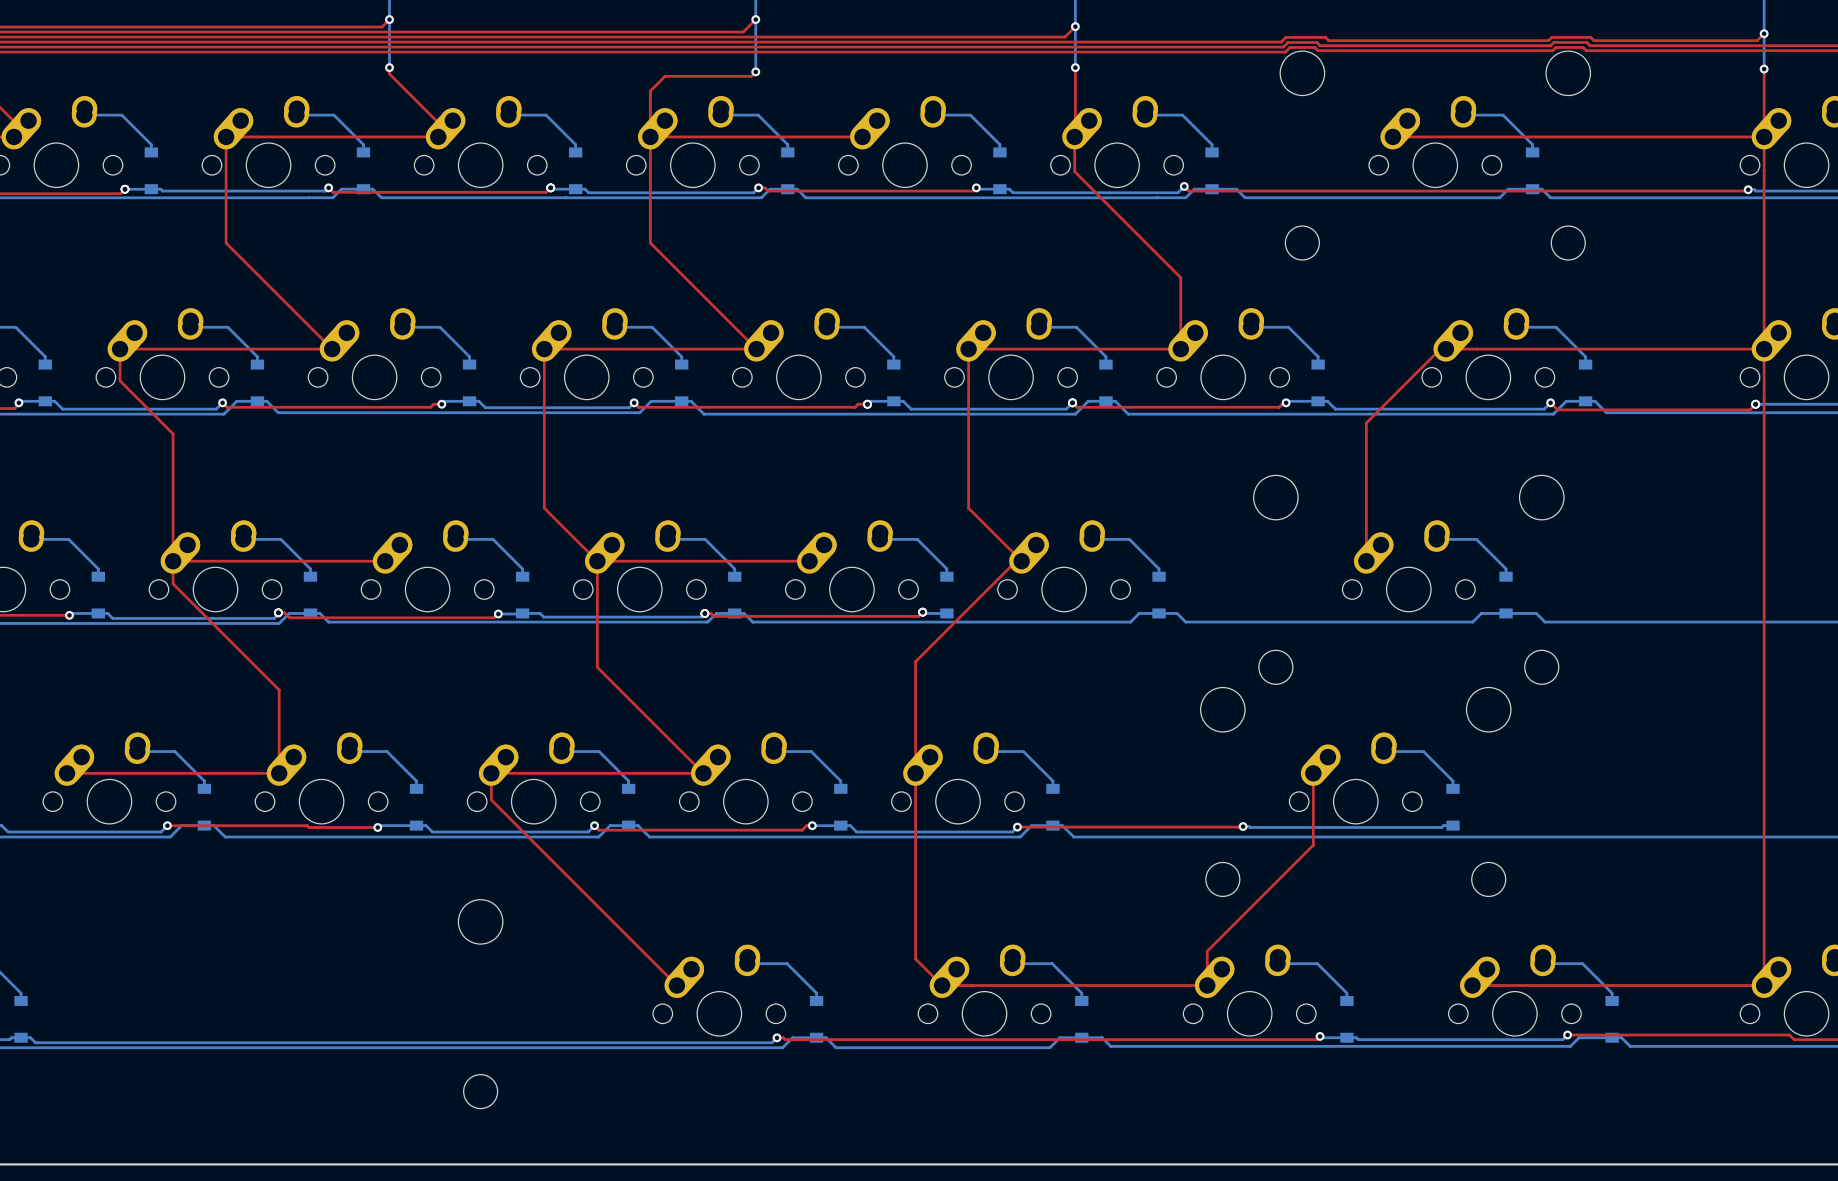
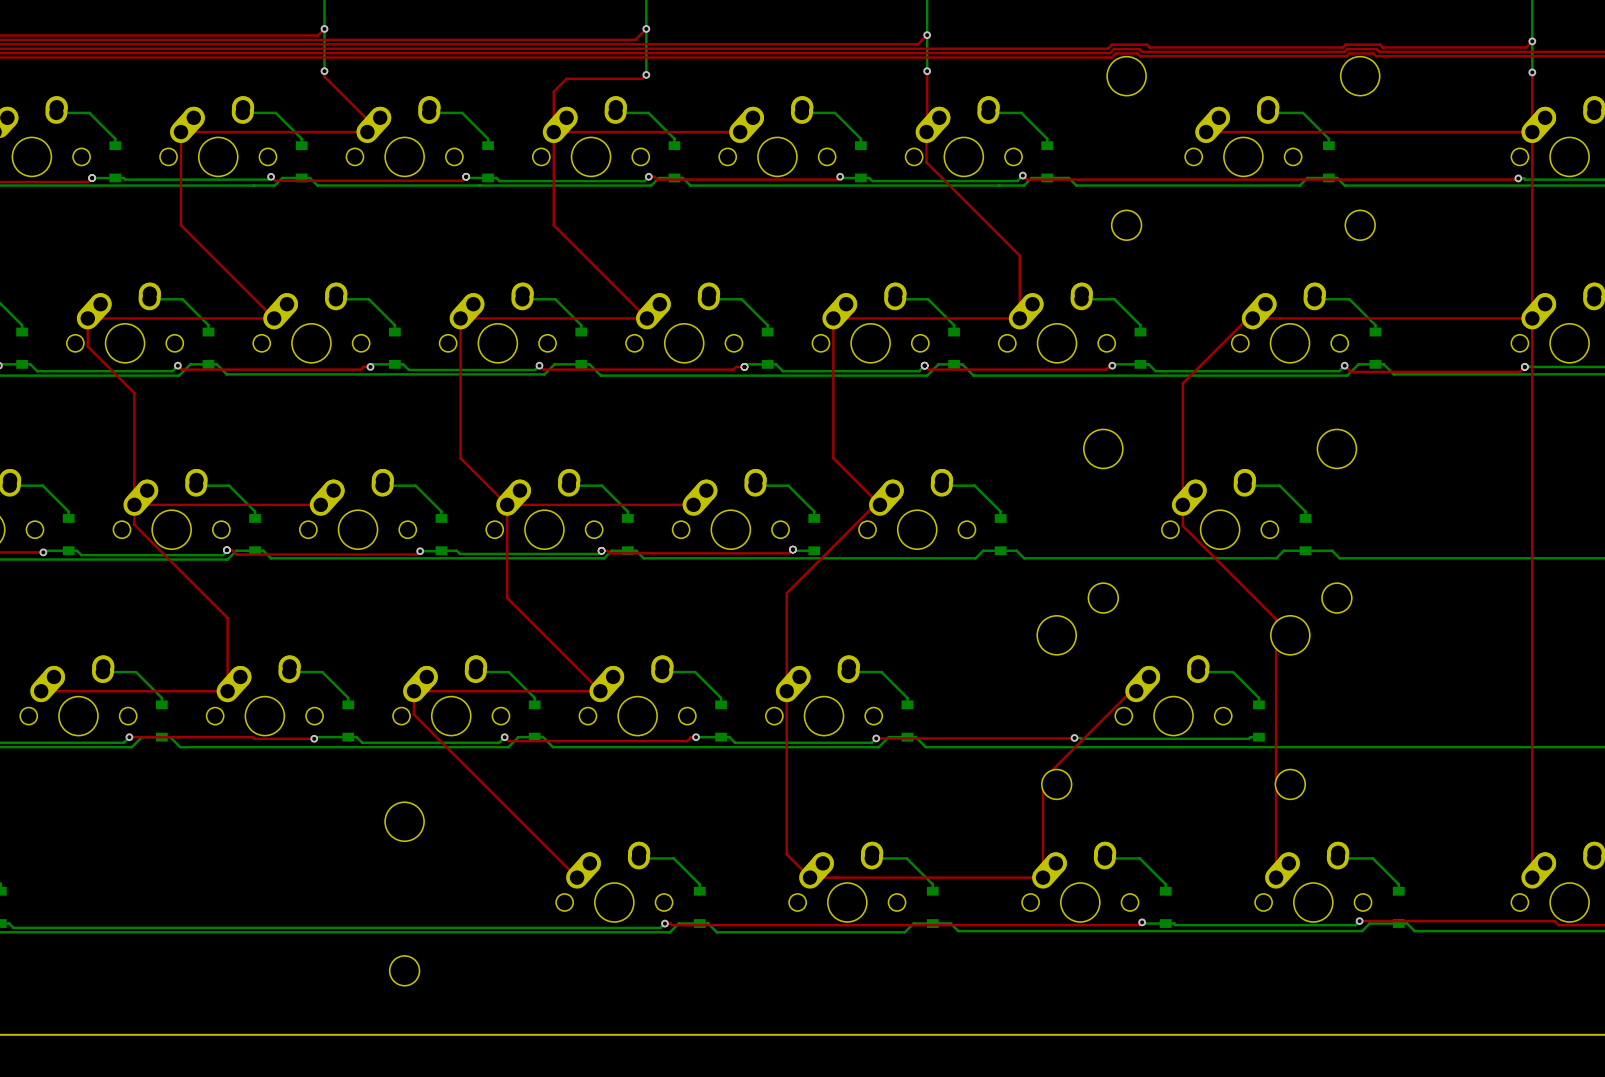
top track: (1313, 773) (1313, 845) (1207, 951) -> (1131, 691) (1043, 779) (1043, 847)
top track: (1472, 985) (1764, 985) -> (1276, 877) (1276, 619) (1182, 526) (1182, 504)

